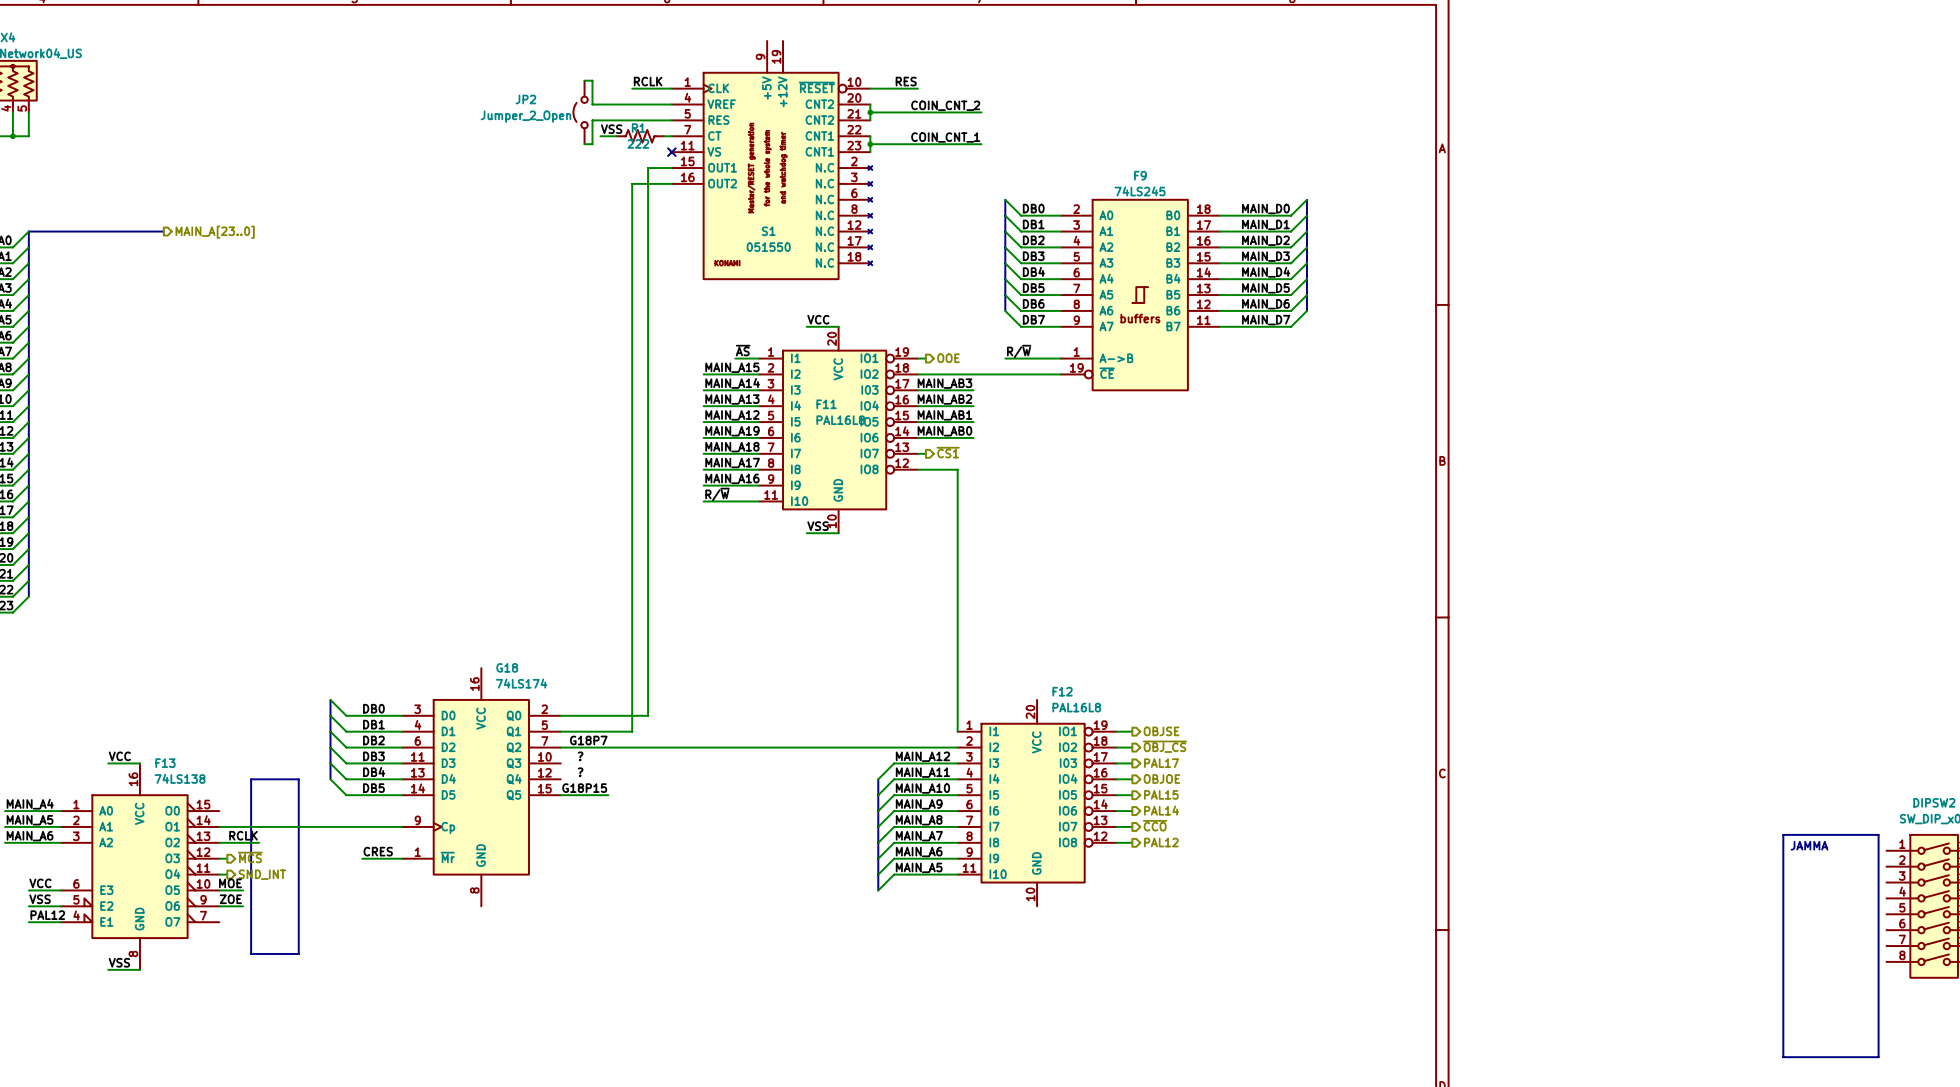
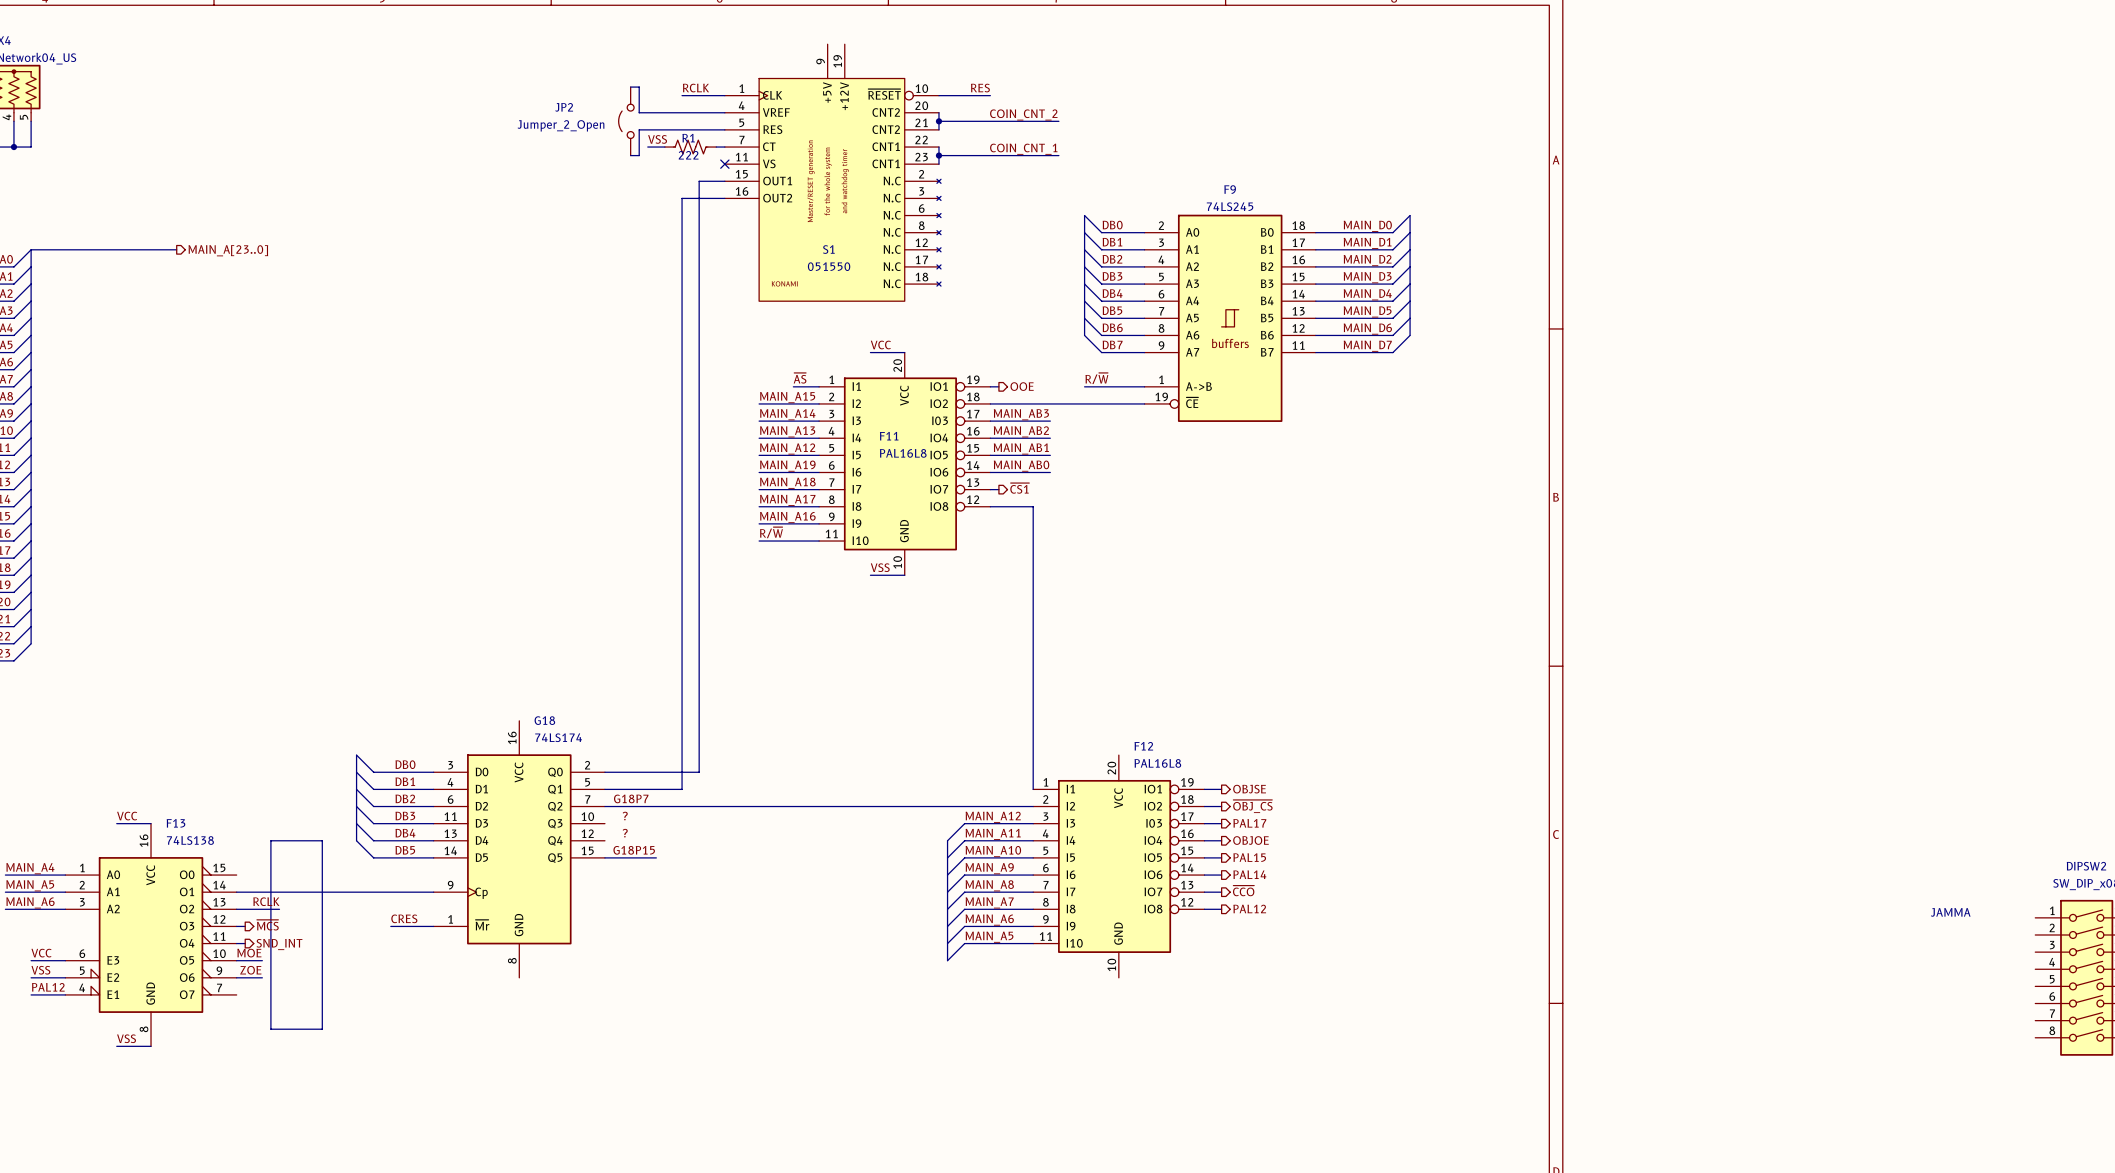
line: (1783, 834) (1878, 834) (1878, 1057) (1783, 1057) (1783, 834) -> none

